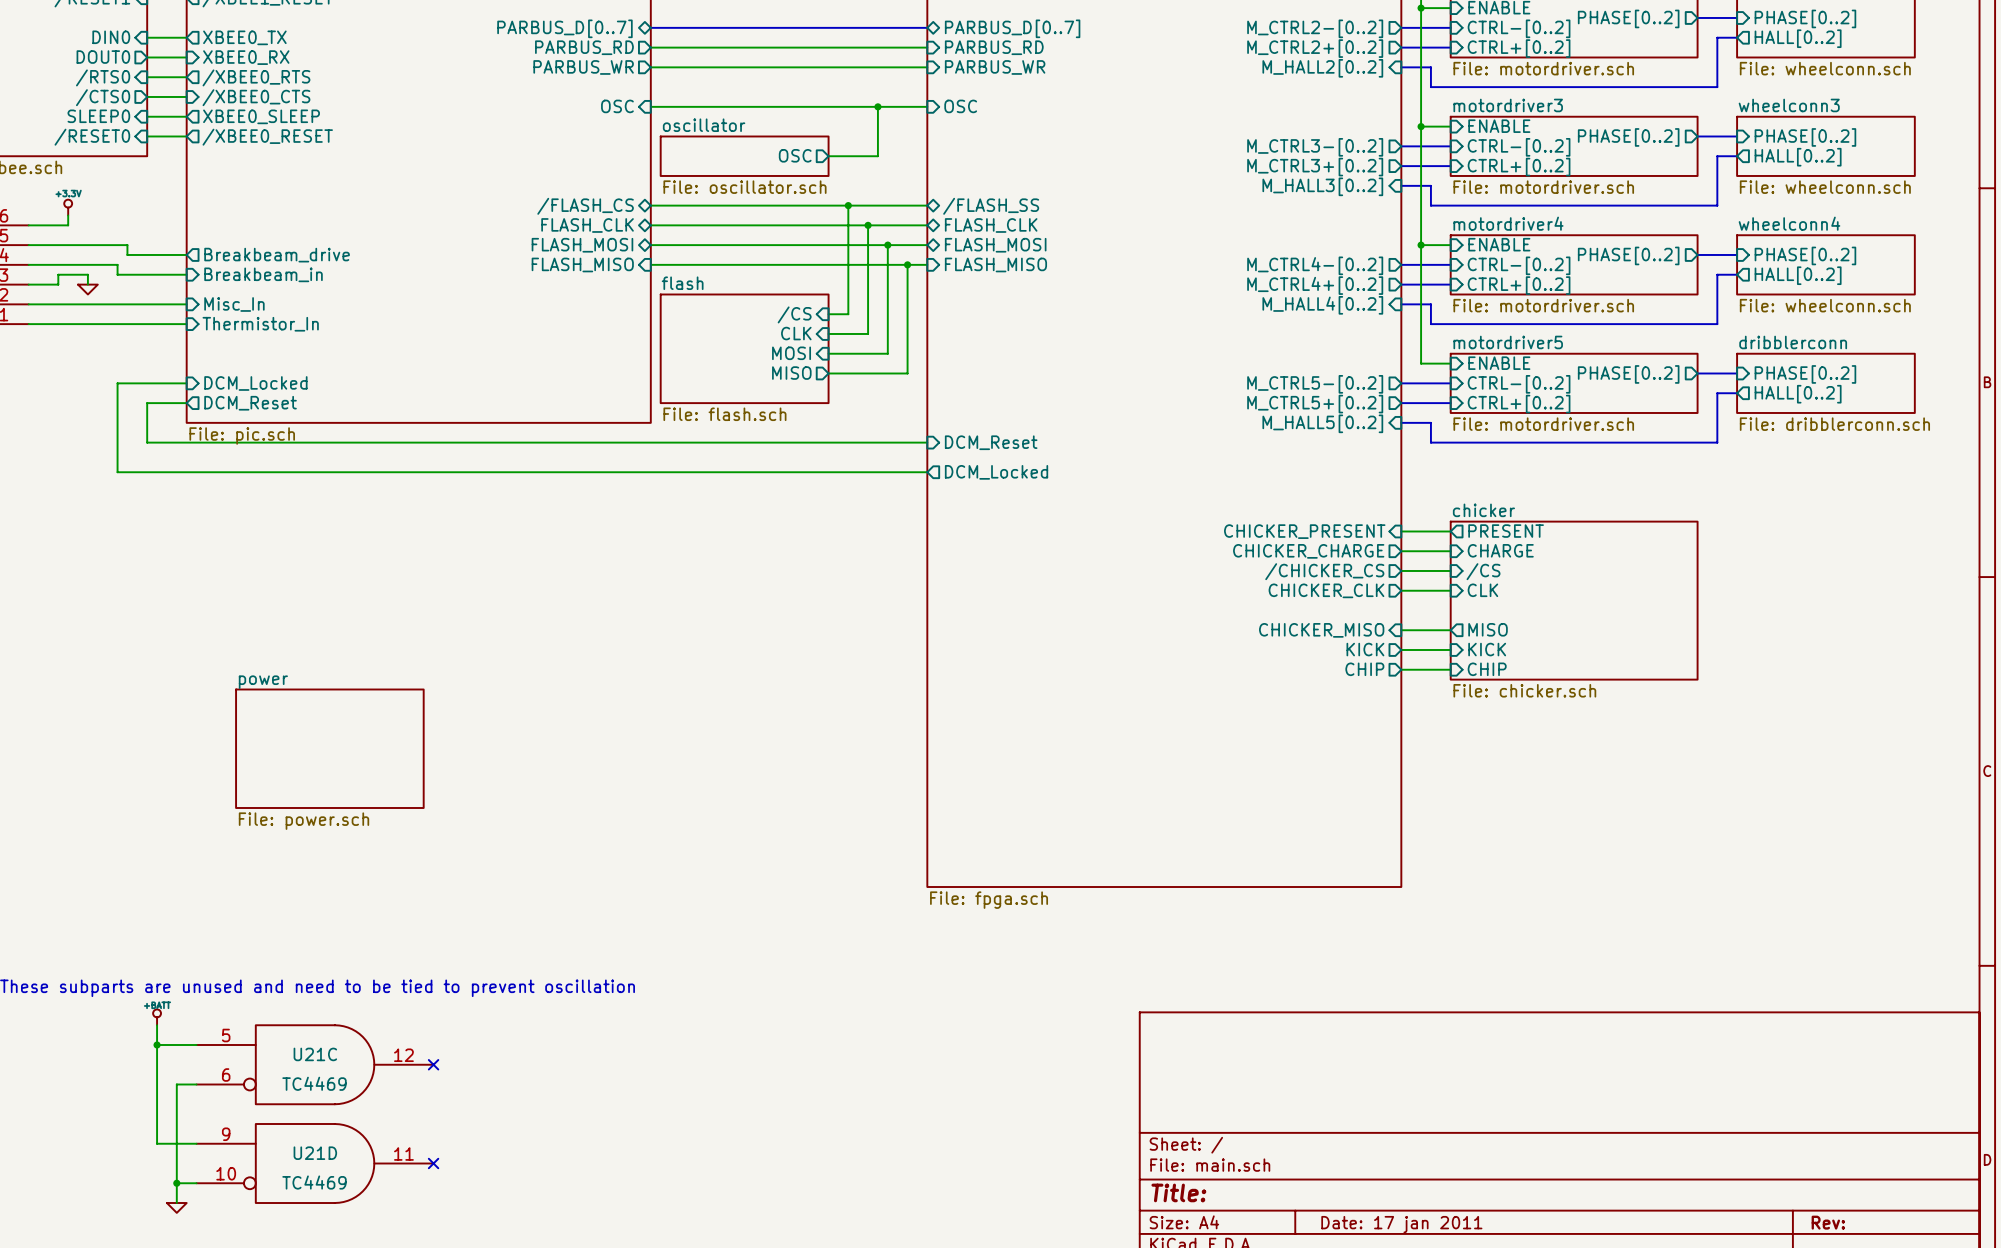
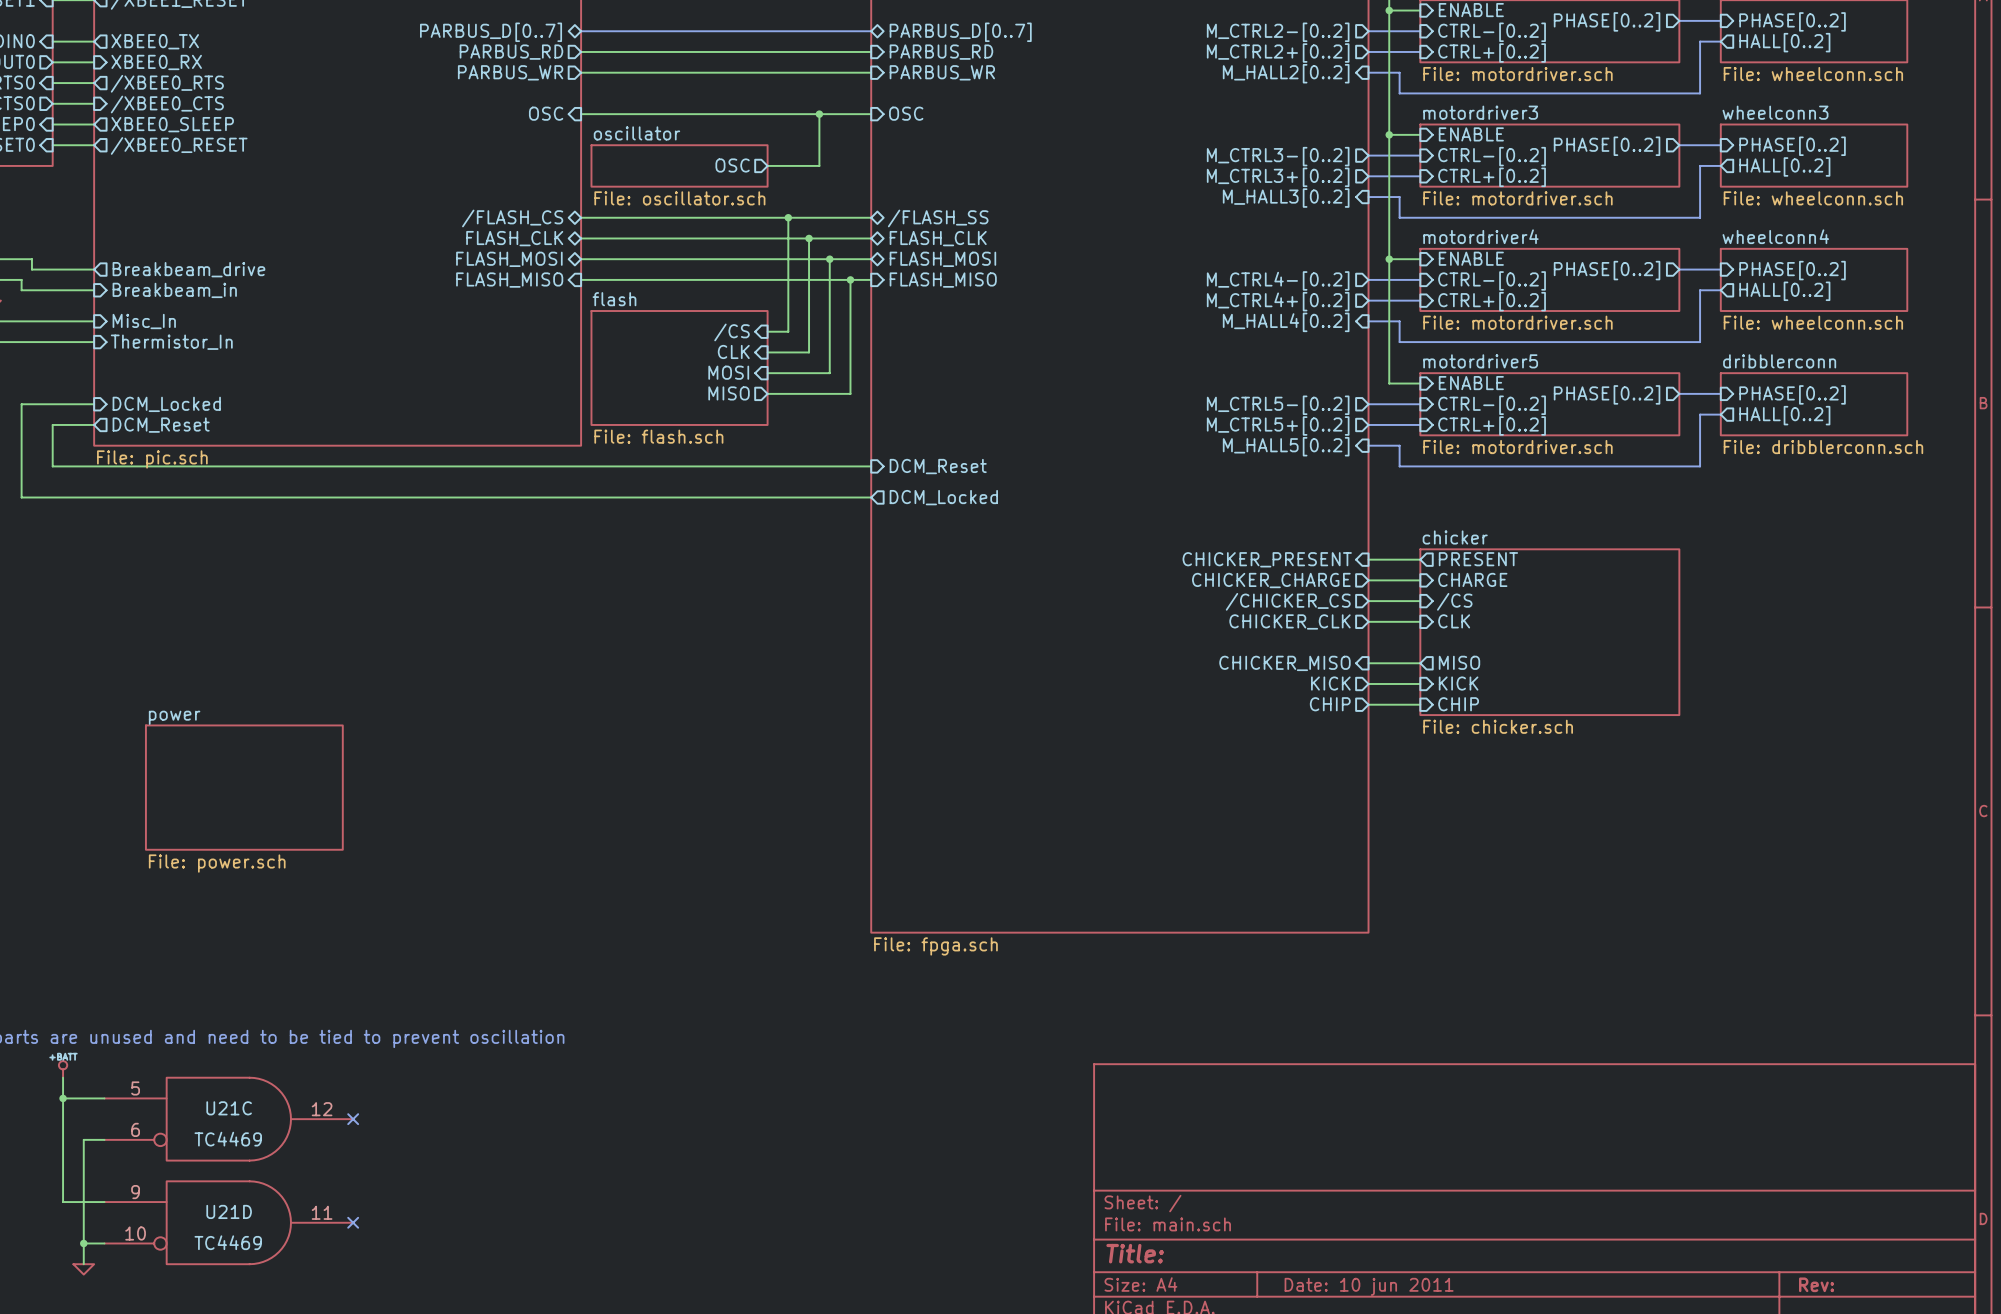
title block: Date: 17 jan 2011 (1401, 1224) -> Date: 10 jun 2011 (1369, 1286)

